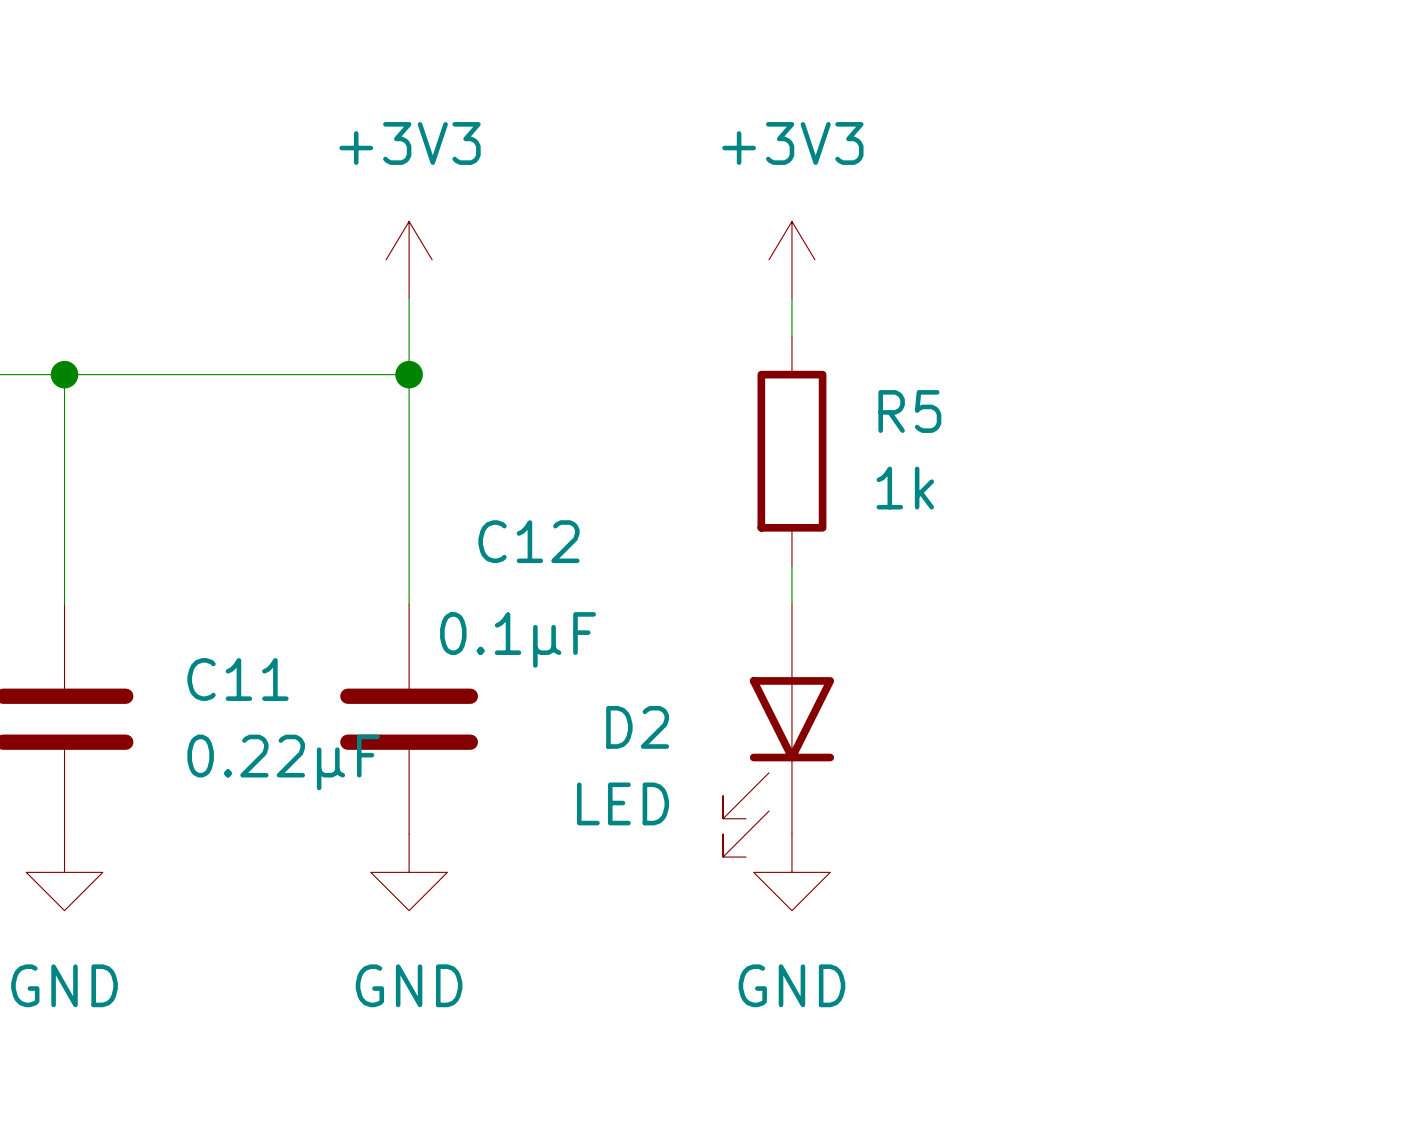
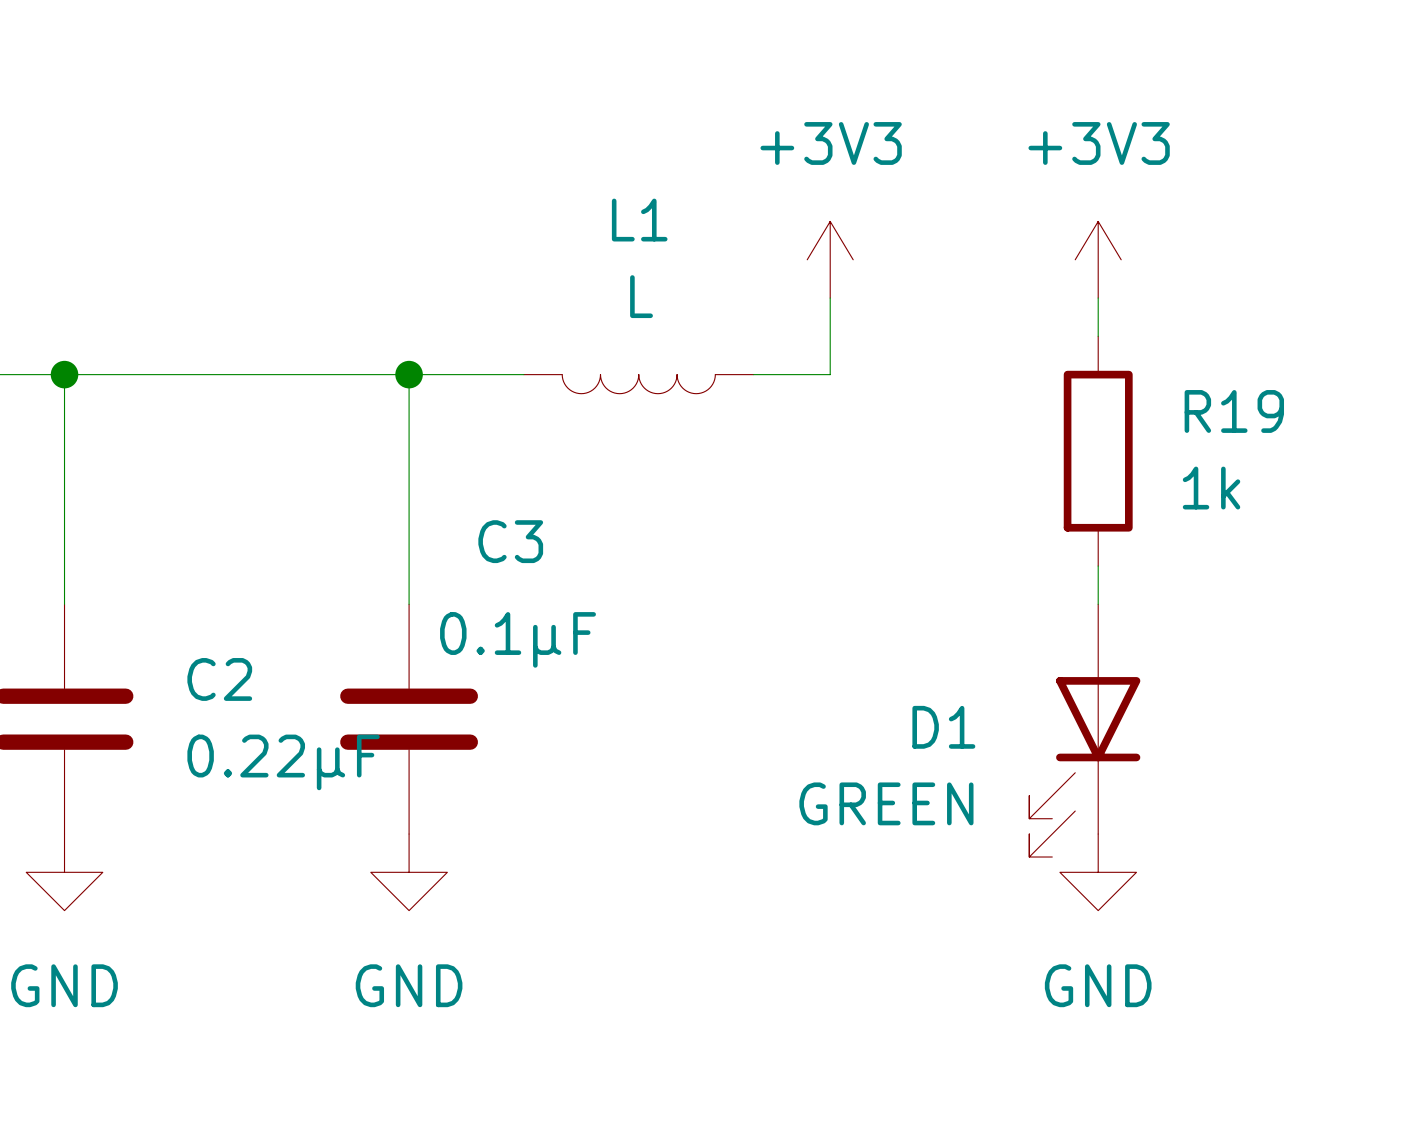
power symbol: +3V3 (409, 259) -> none
power symbol position: +3V3 (791, 259) -> +3V3 (830, 259)
power symbol: none -> +3V3 (1098, 259)
wire: (409, 298) (409, 374) -> (523, 374) (409, 374)
wire: (791, 298) (791, 336) -> (1098, 298) (1098, 336)
wire: none -> (830, 298) (830, 374) (753, 374)
L1: none -> L (638, 384)
R5: 1k (791, 451) -> none
R19: none -> 1k (1098, 451)
C12 name: C12 (528, 541) -> C3 (510, 541)
wire: (791, 566) (791, 604) -> (1098, 566) (1098, 604)
C11 name: C11 (238, 679) -> C2 (219, 679)
D2: LED (778, 730) -> none
D1: none -> GREEN (1084, 730)
power symbol position: GND (791, 872) -> GND (1098, 872)

